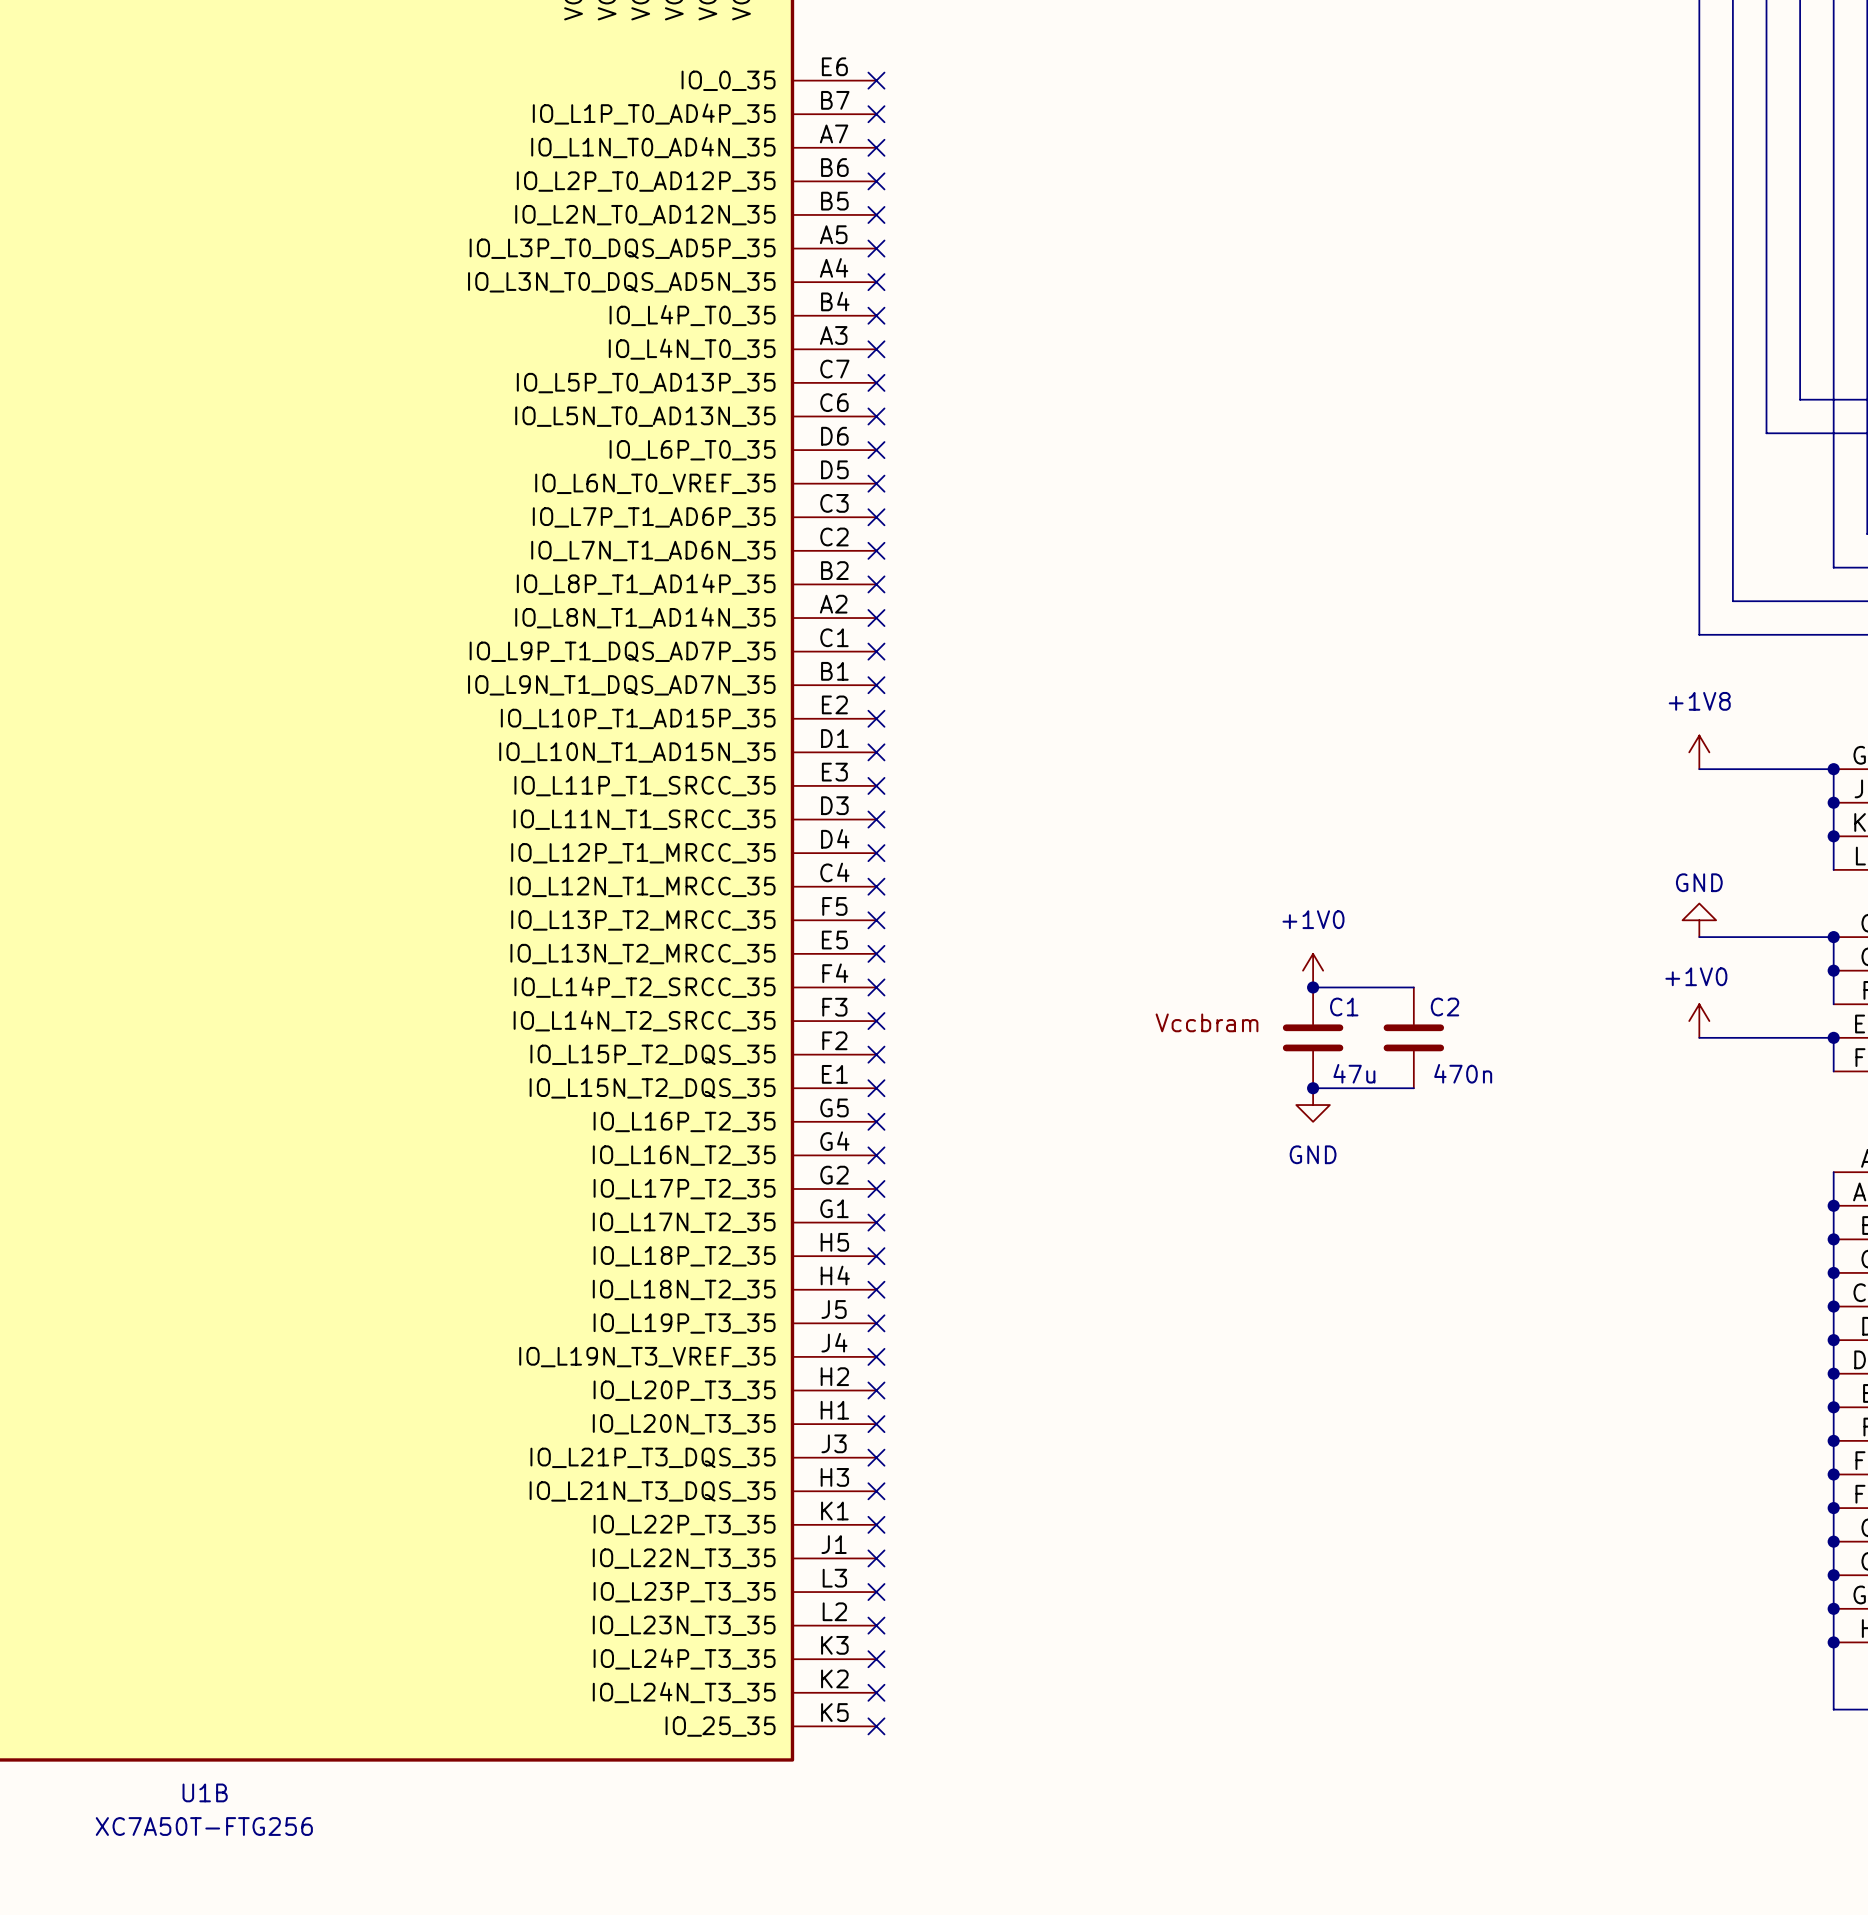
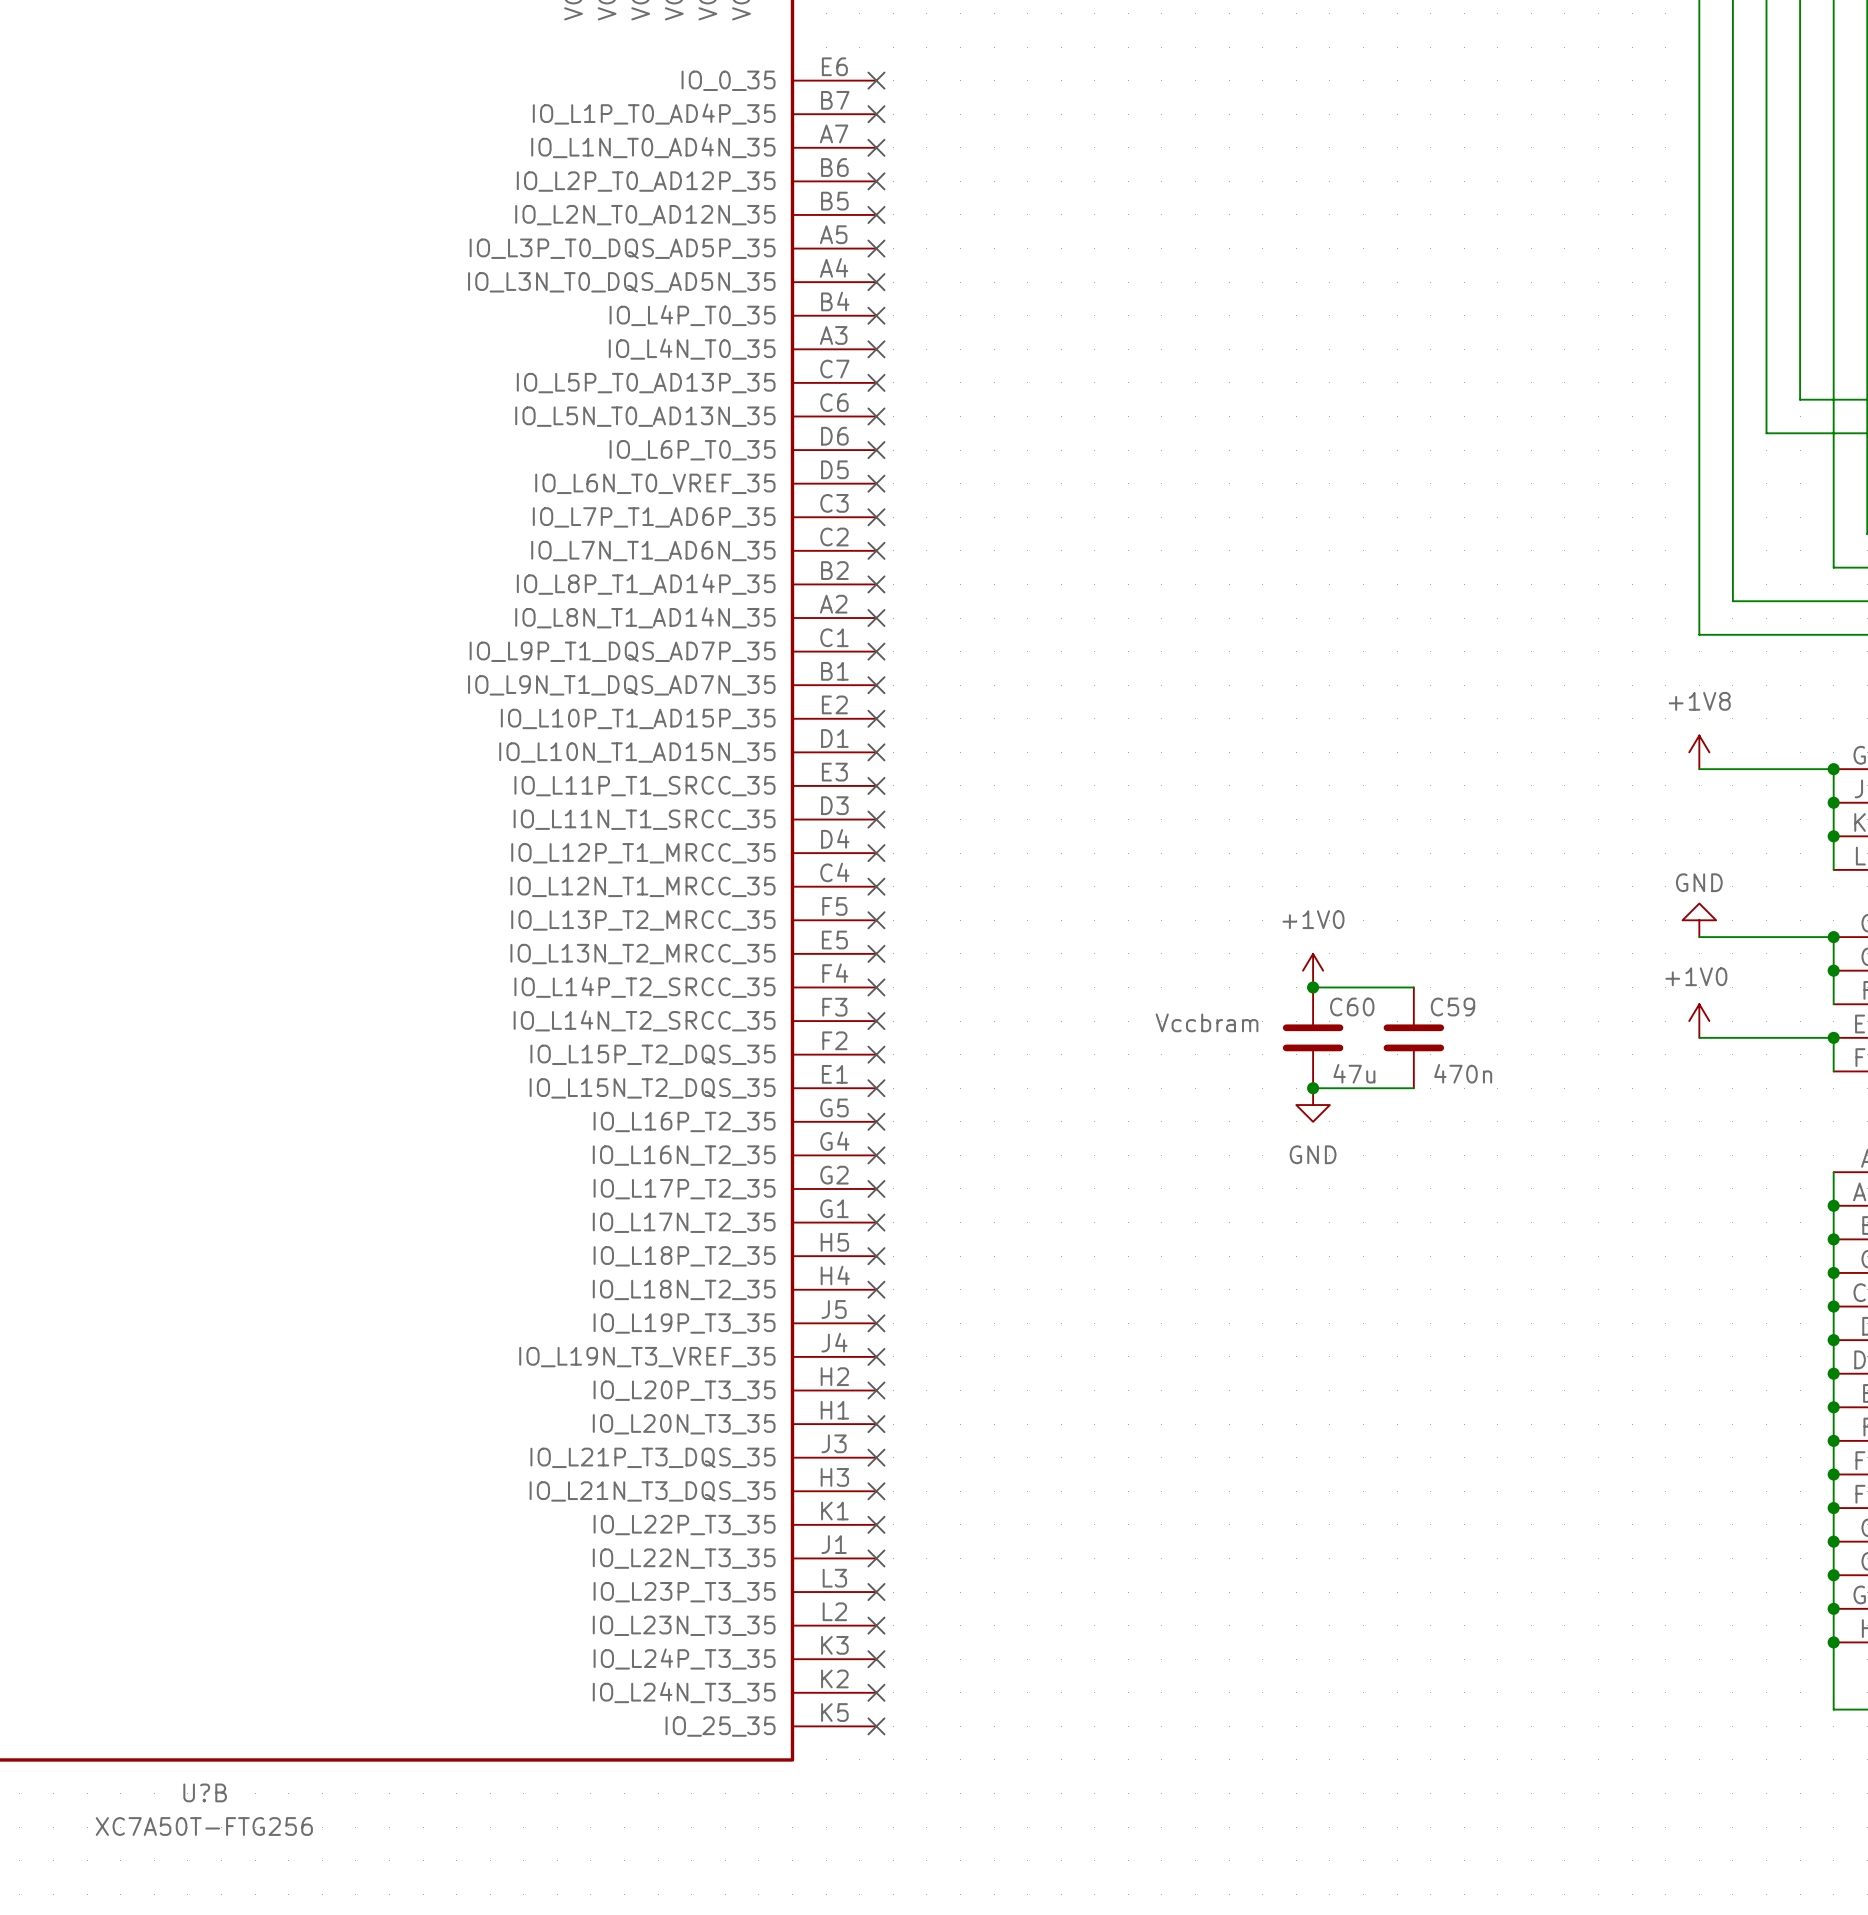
C1 name: C1 (1344, 1006) -> C60 (1352, 1006)
C2 name: C2 (1445, 1006) -> C59 (1452, 1006)
U1B name: U1B (205, 1792) -> U?B (205, 1792)

